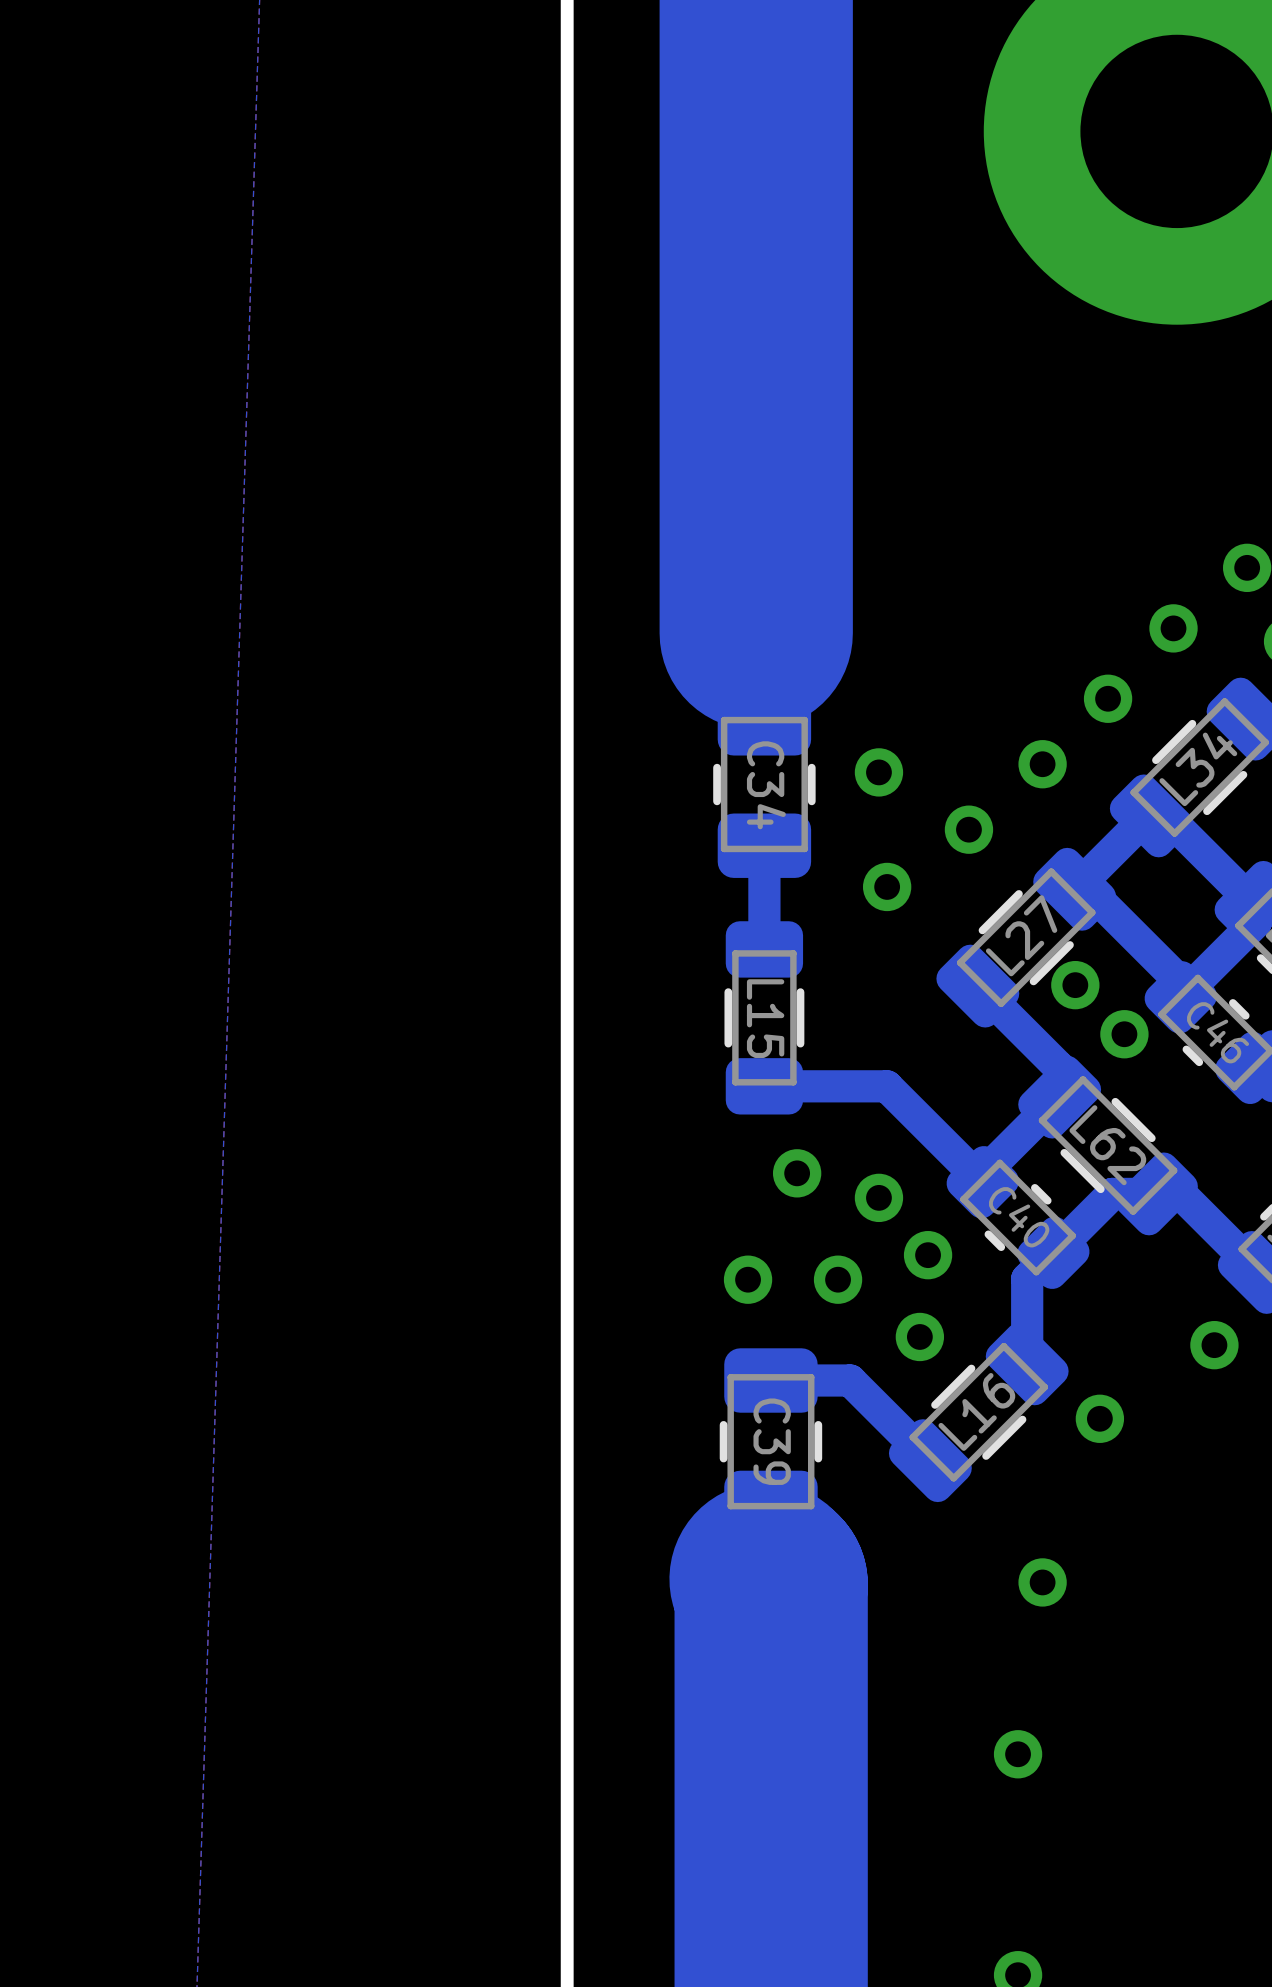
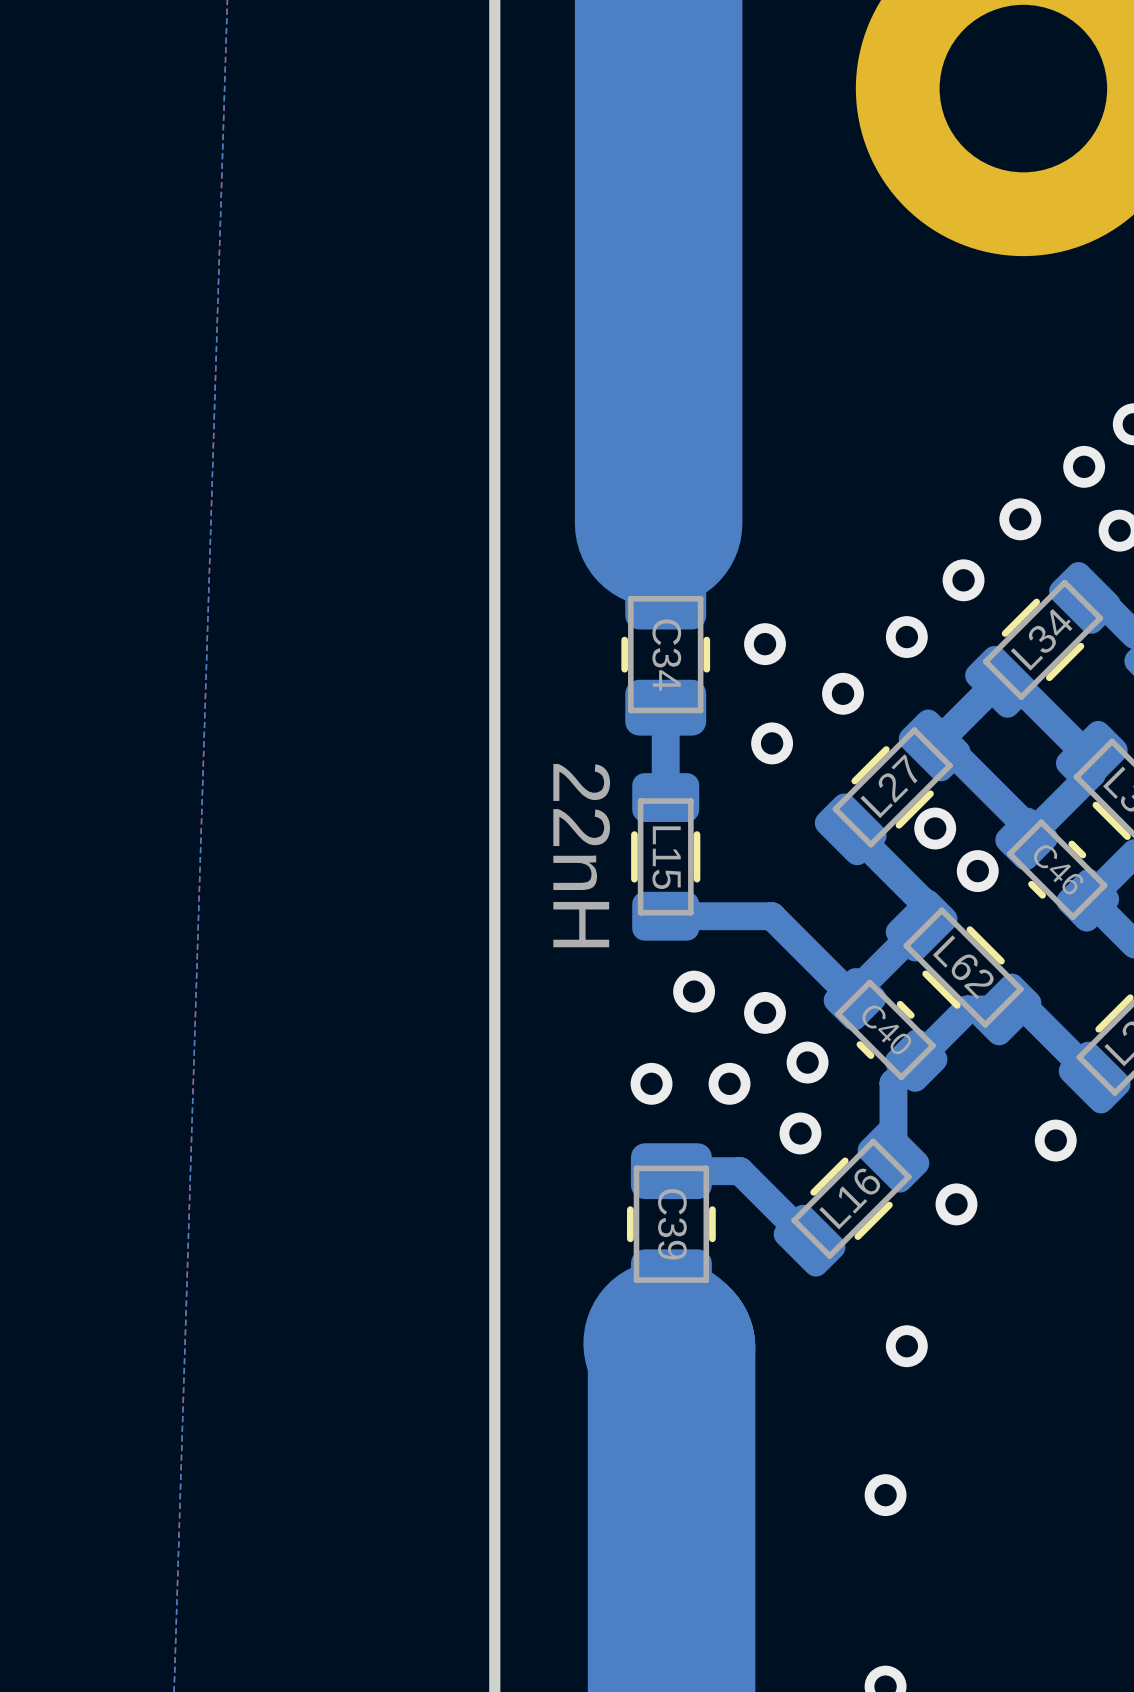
L15 value: none -> 22nH (581, 855)

